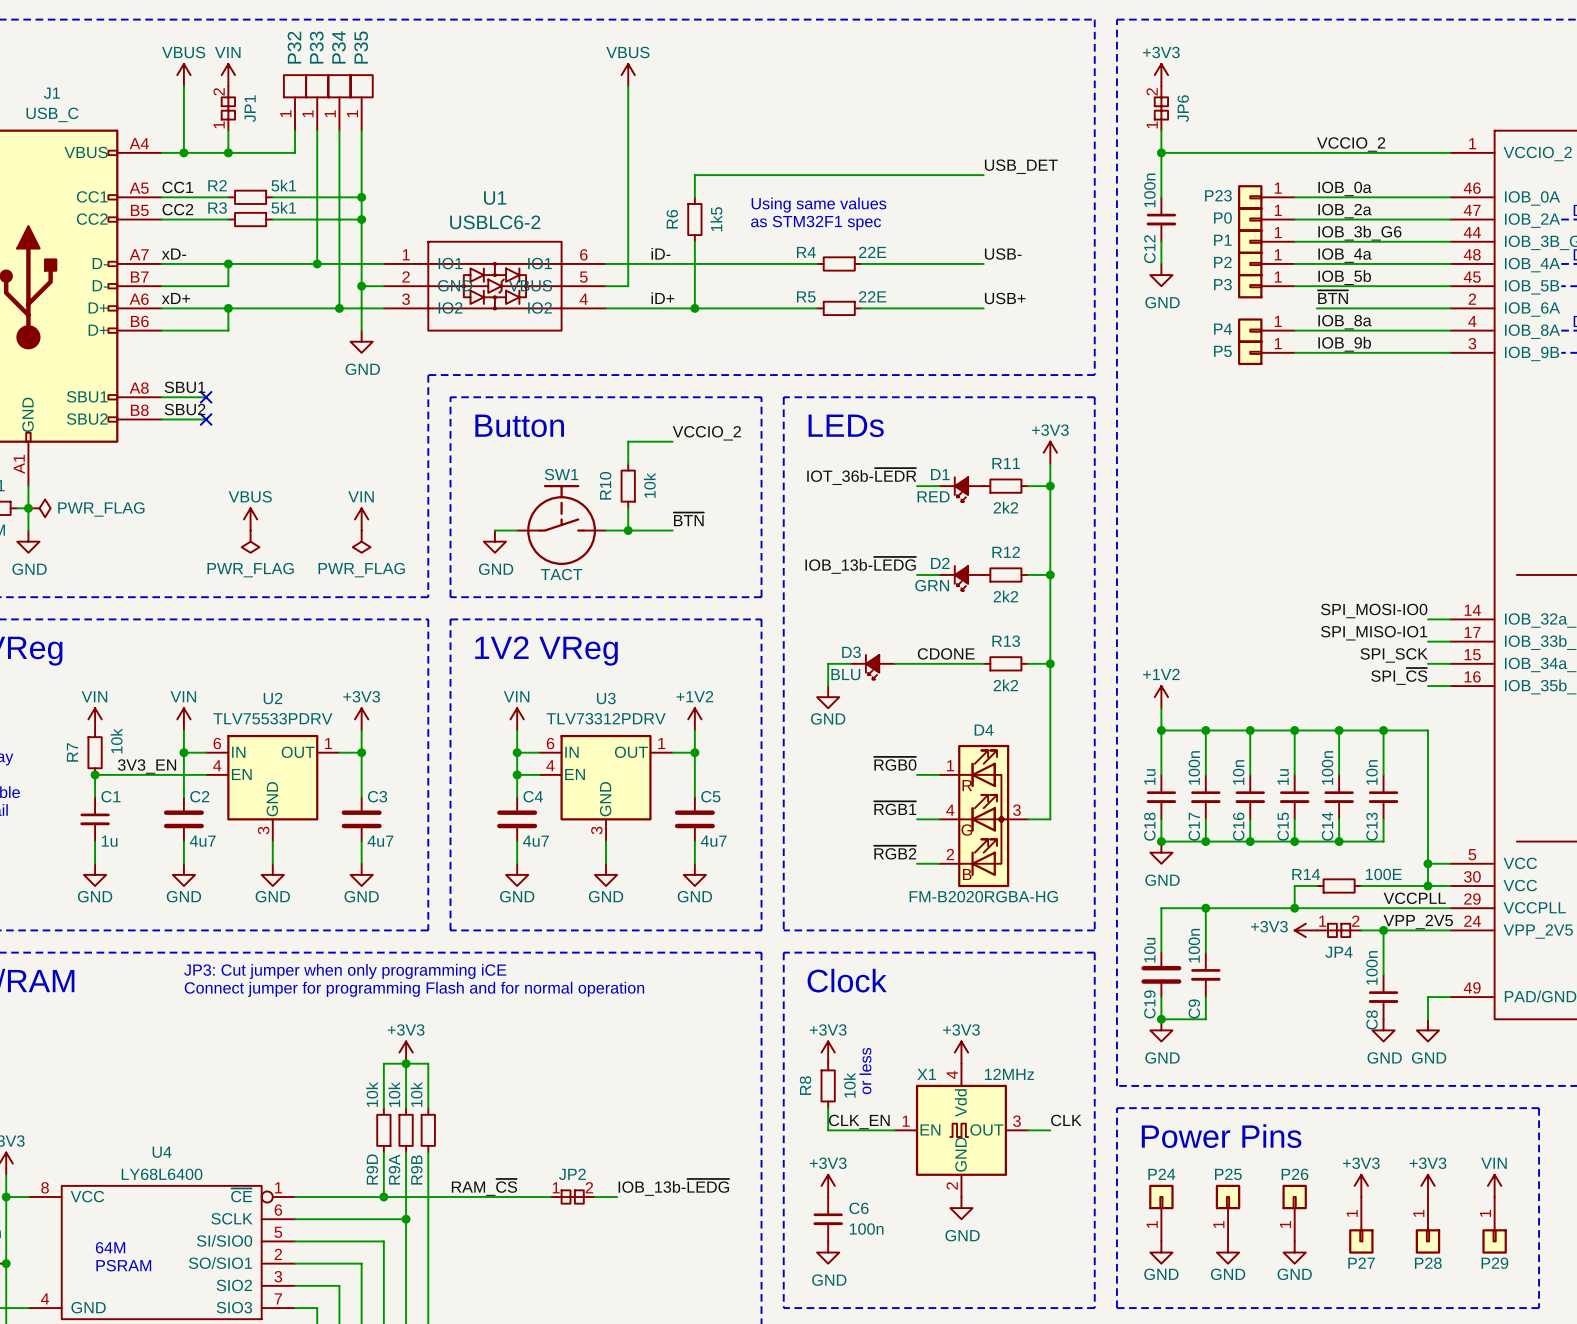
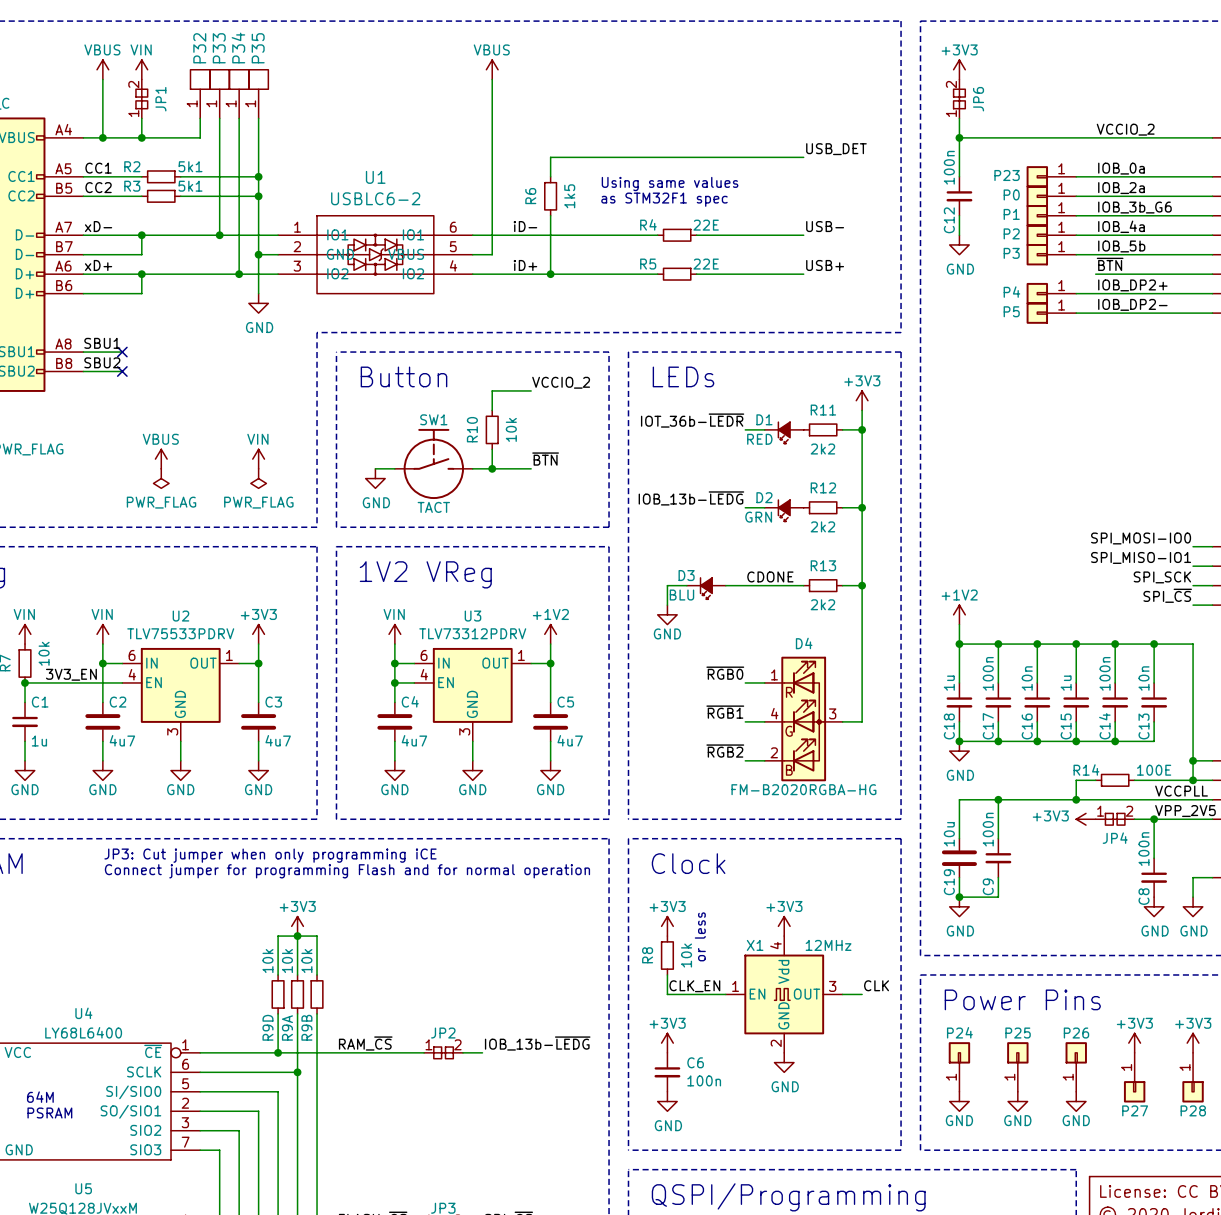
label: IOB_8a (1345, 322) -> IOB_DP2+ (1132, 285)
label: IOB_9b (1344, 344) -> IOB_DP2- (1132, 304)

